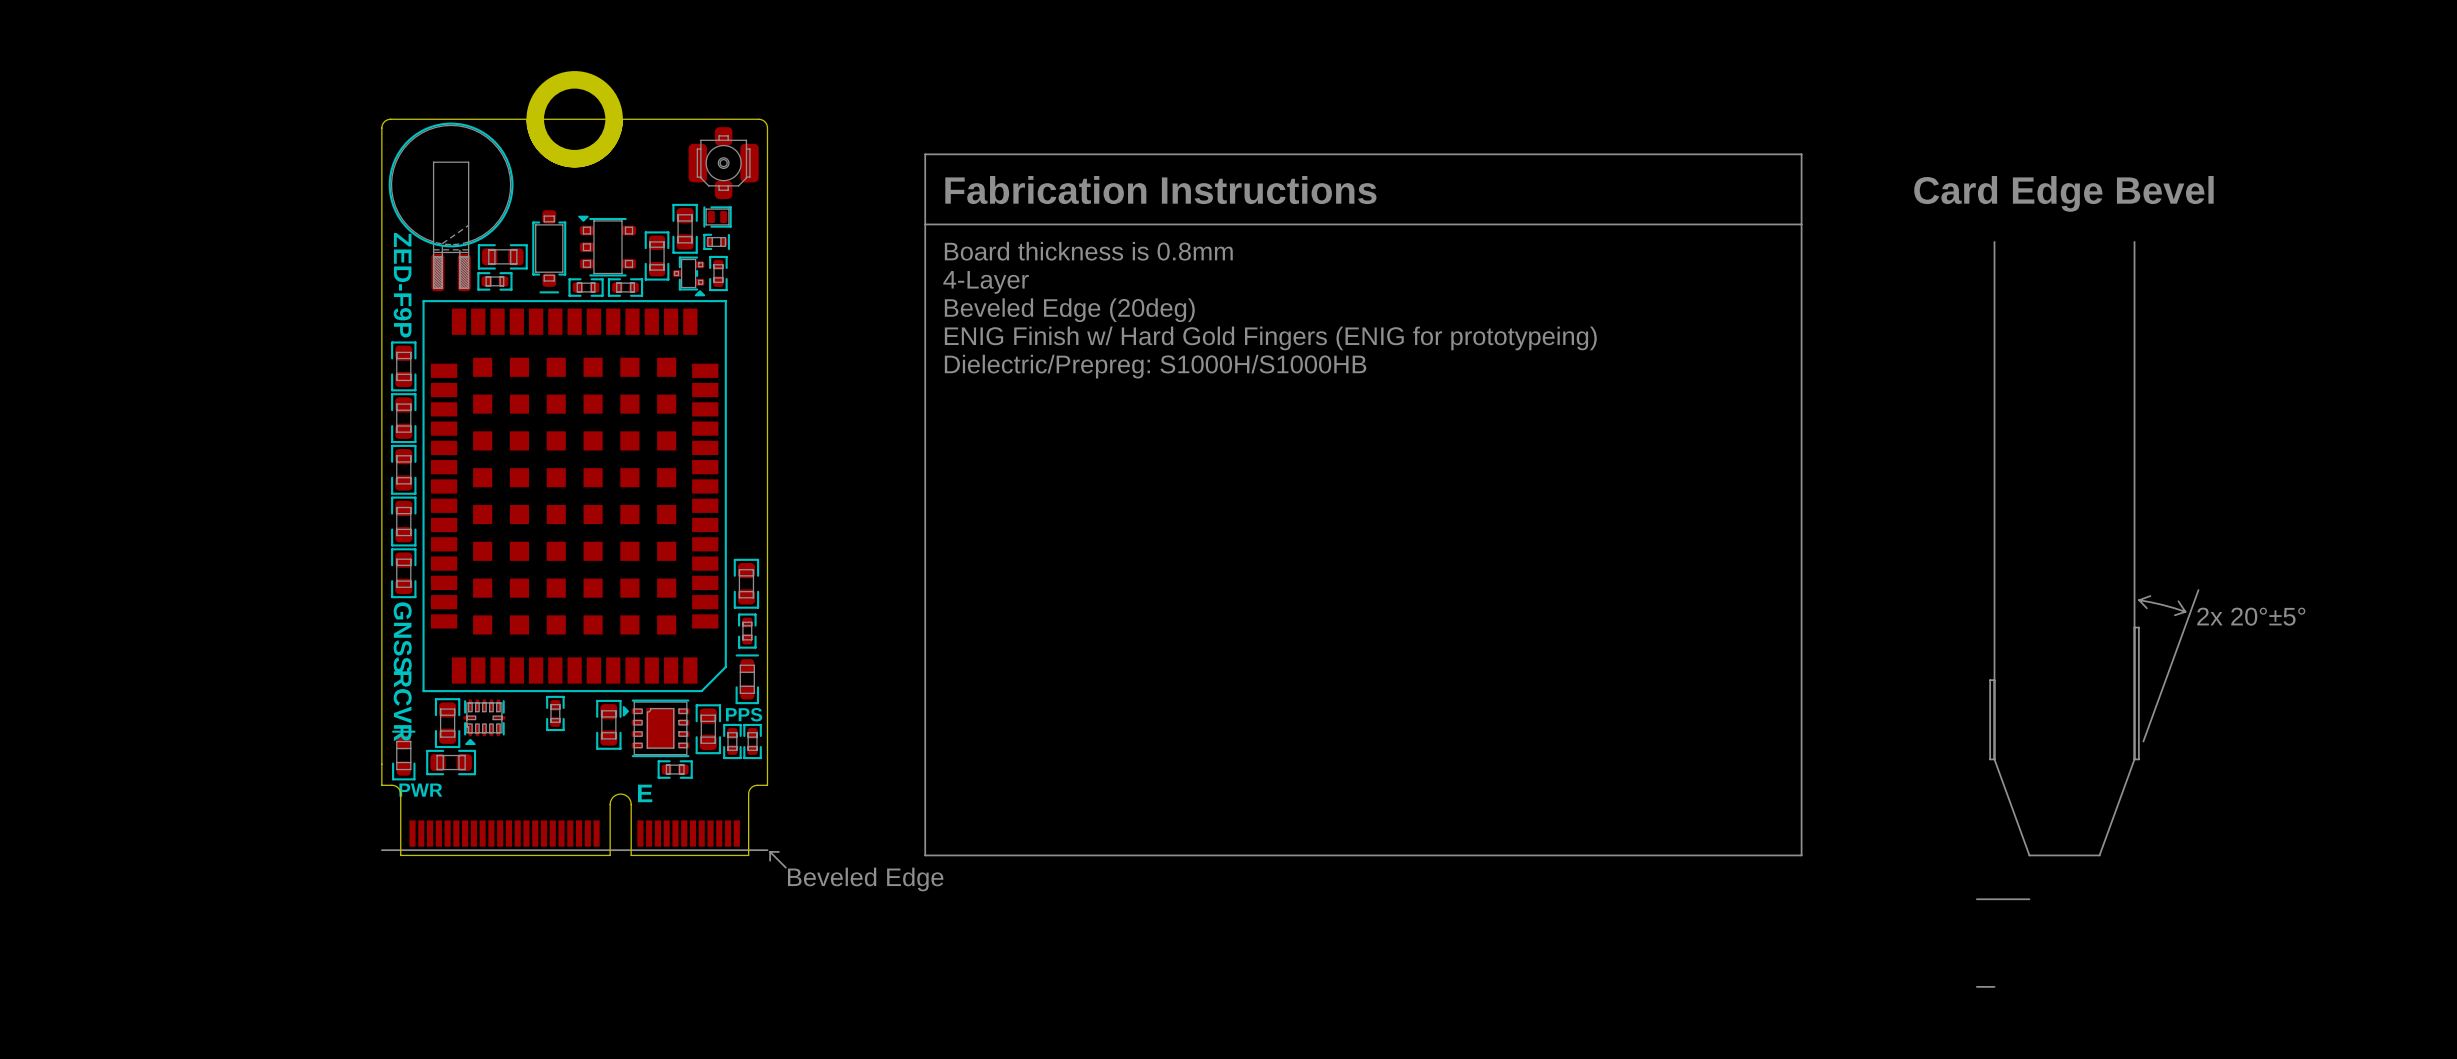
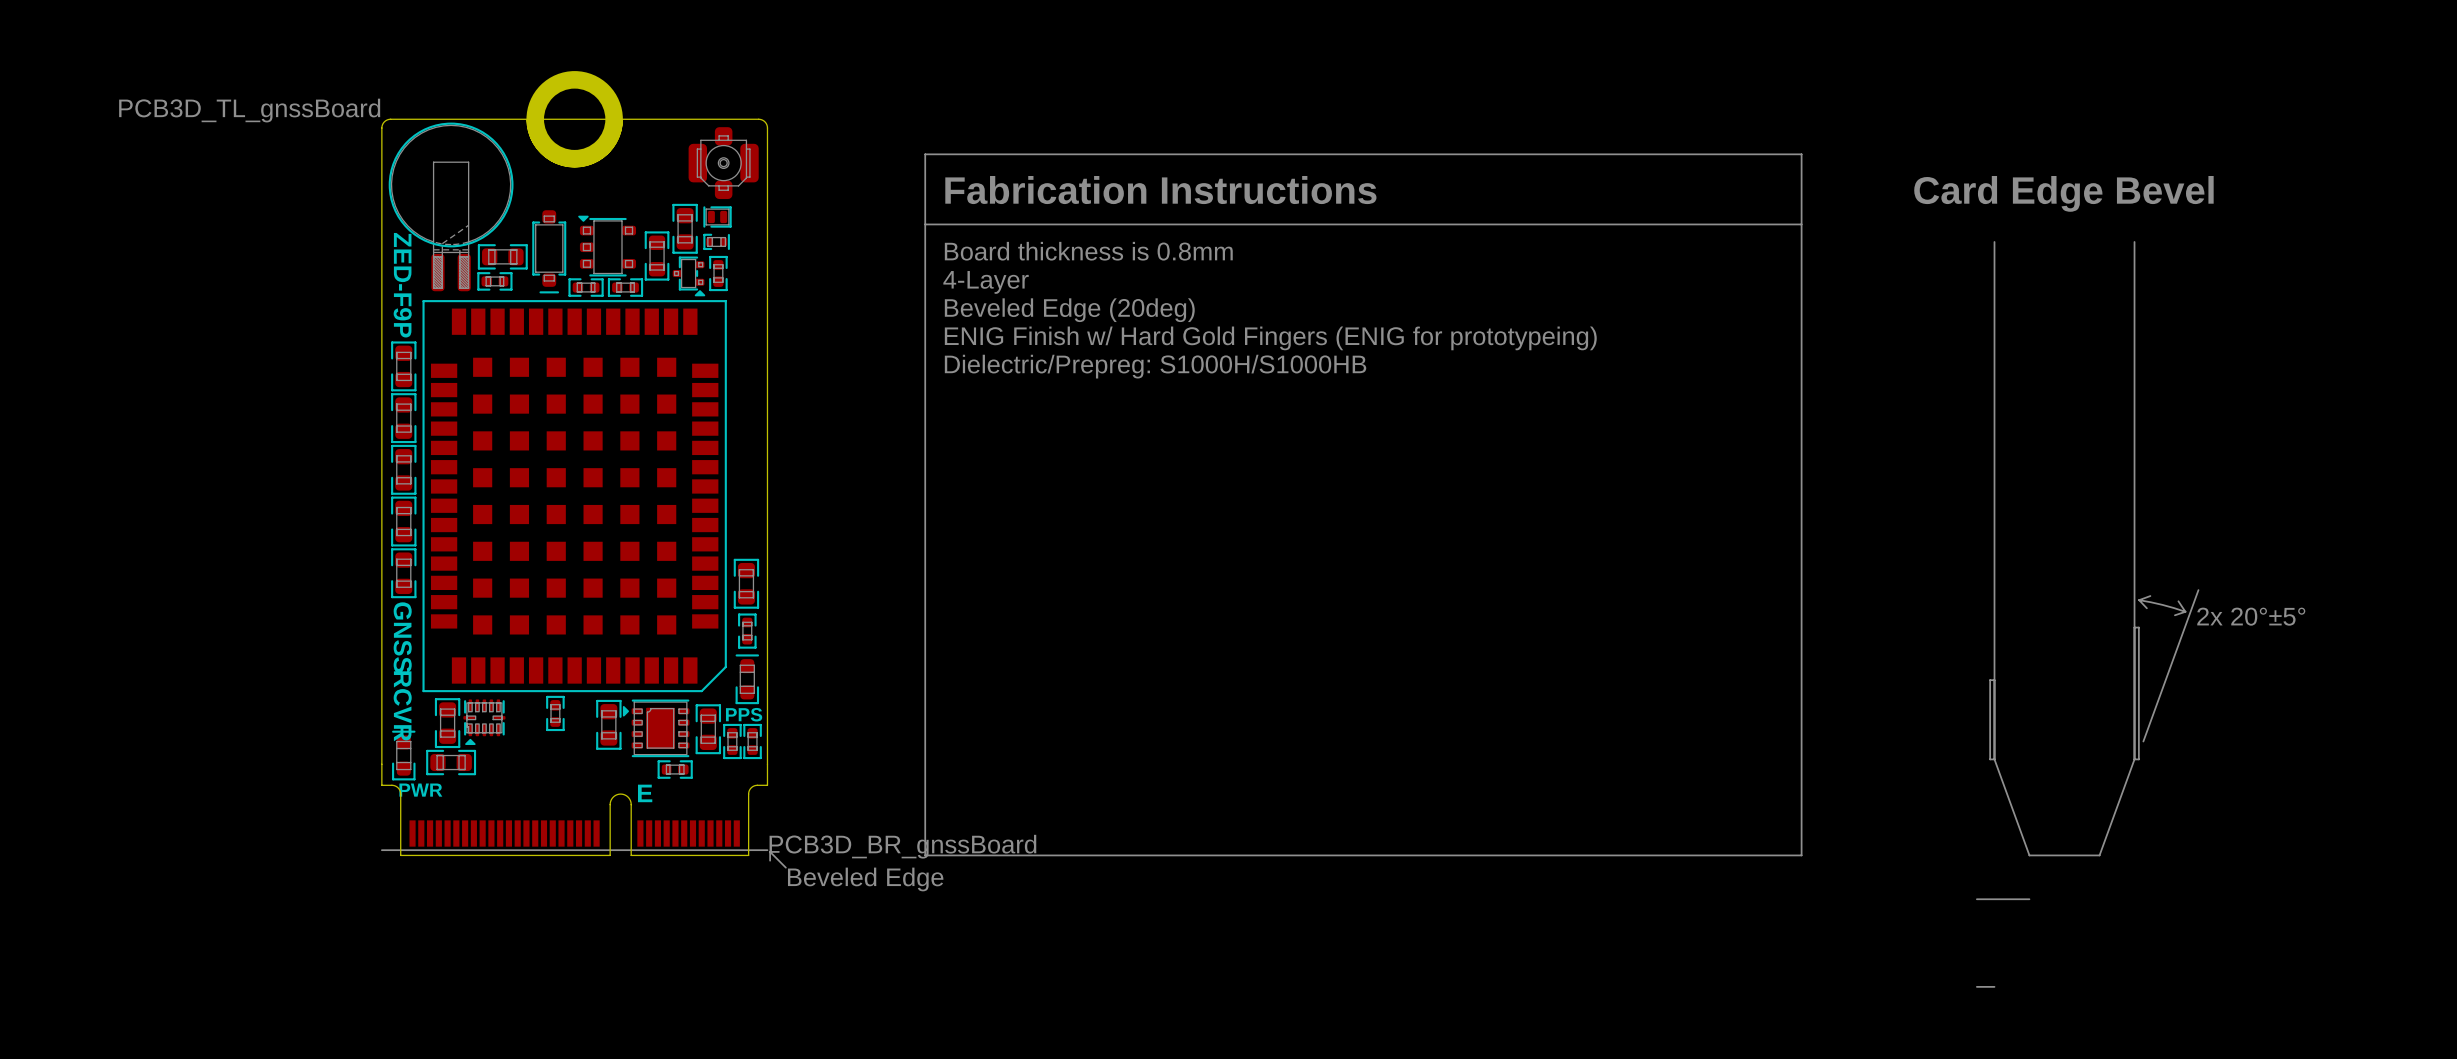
text: none -> PCB3D_TL_gnssBoard (249, 110)
text: none -> PCB3D_BR_gnssBoard (902, 846)

